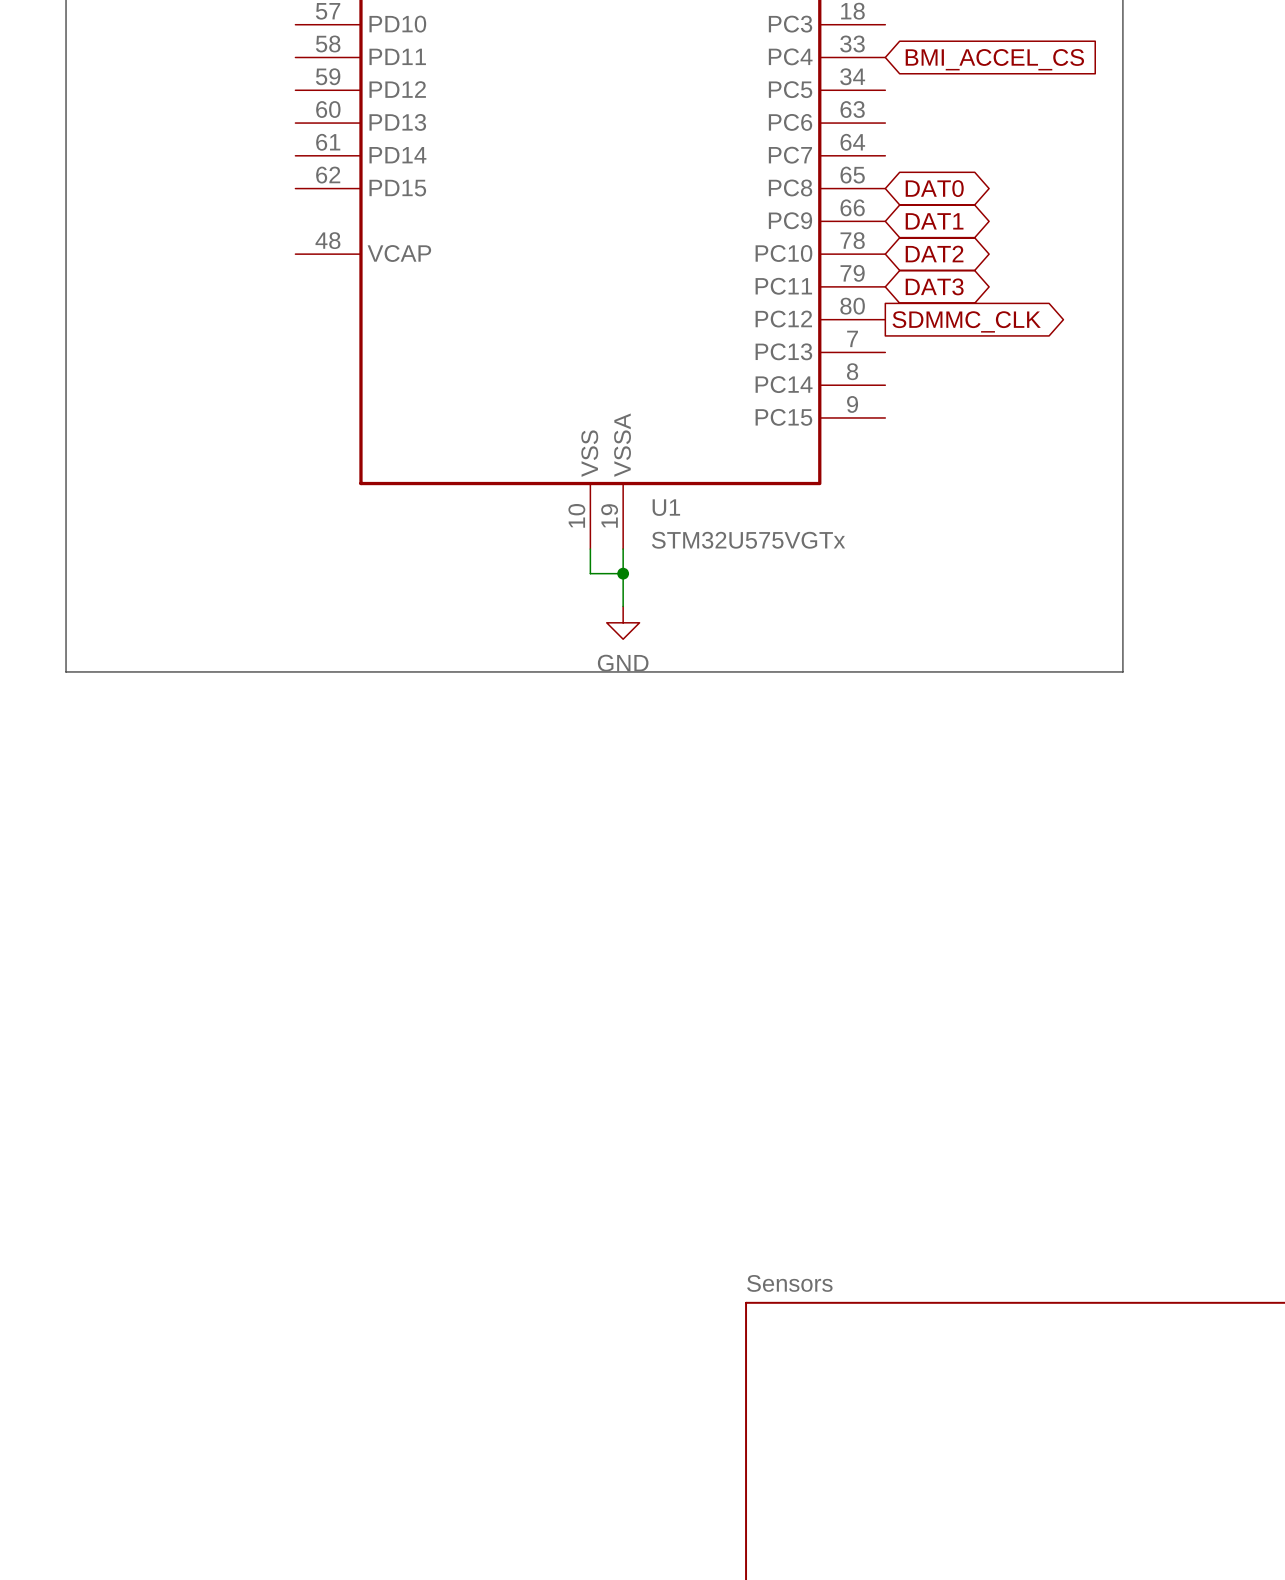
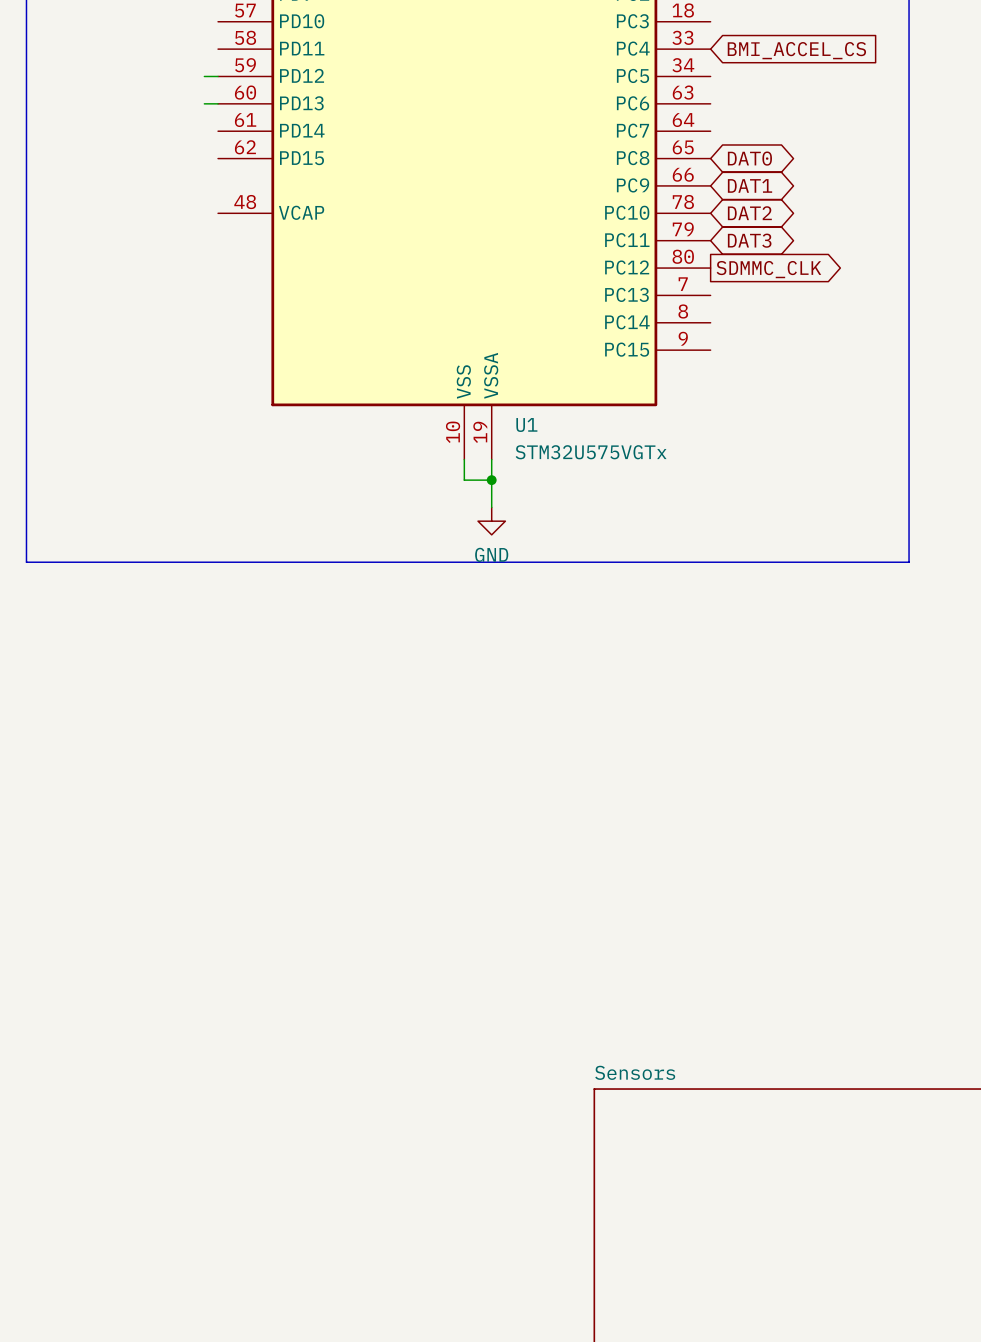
wire: none -> (204, 76) (218, 76)
wire: none -> (204, 103) (218, 103)

